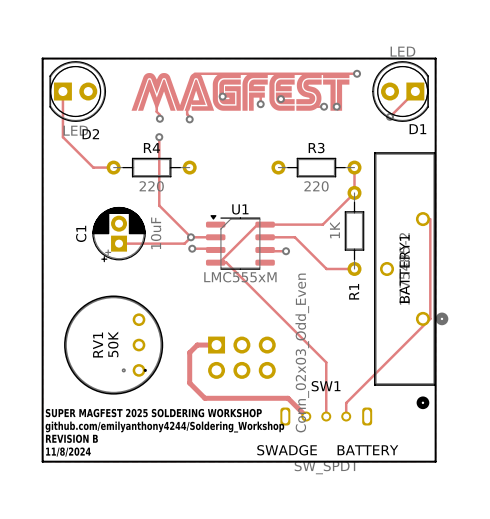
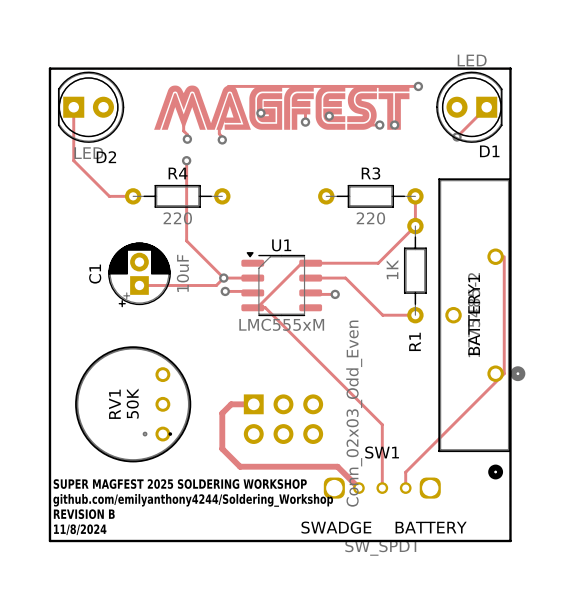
SW1 footprint: [280, 407, 373, 426] -> [323, 477, 441, 499]

